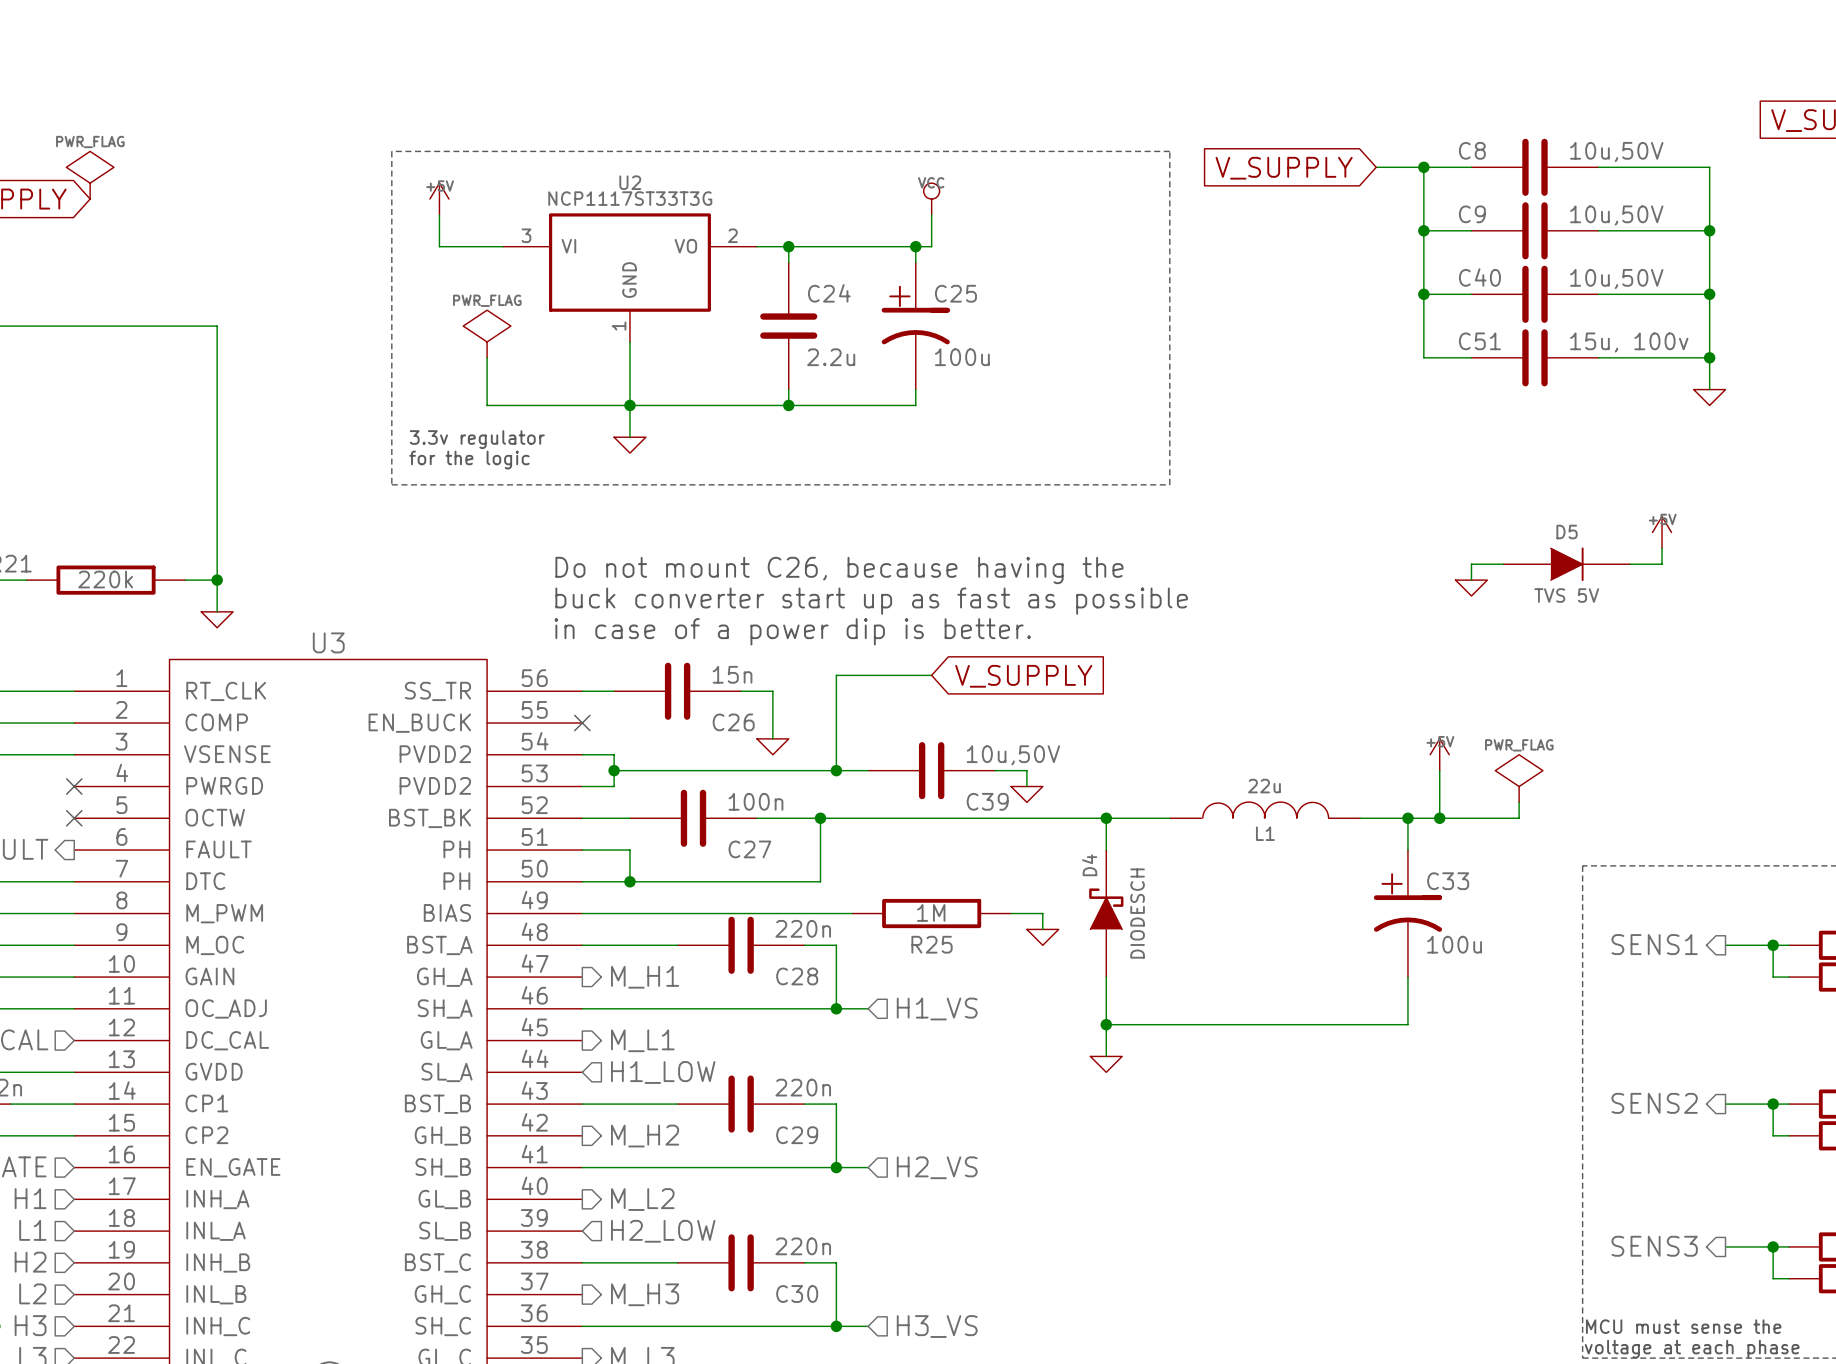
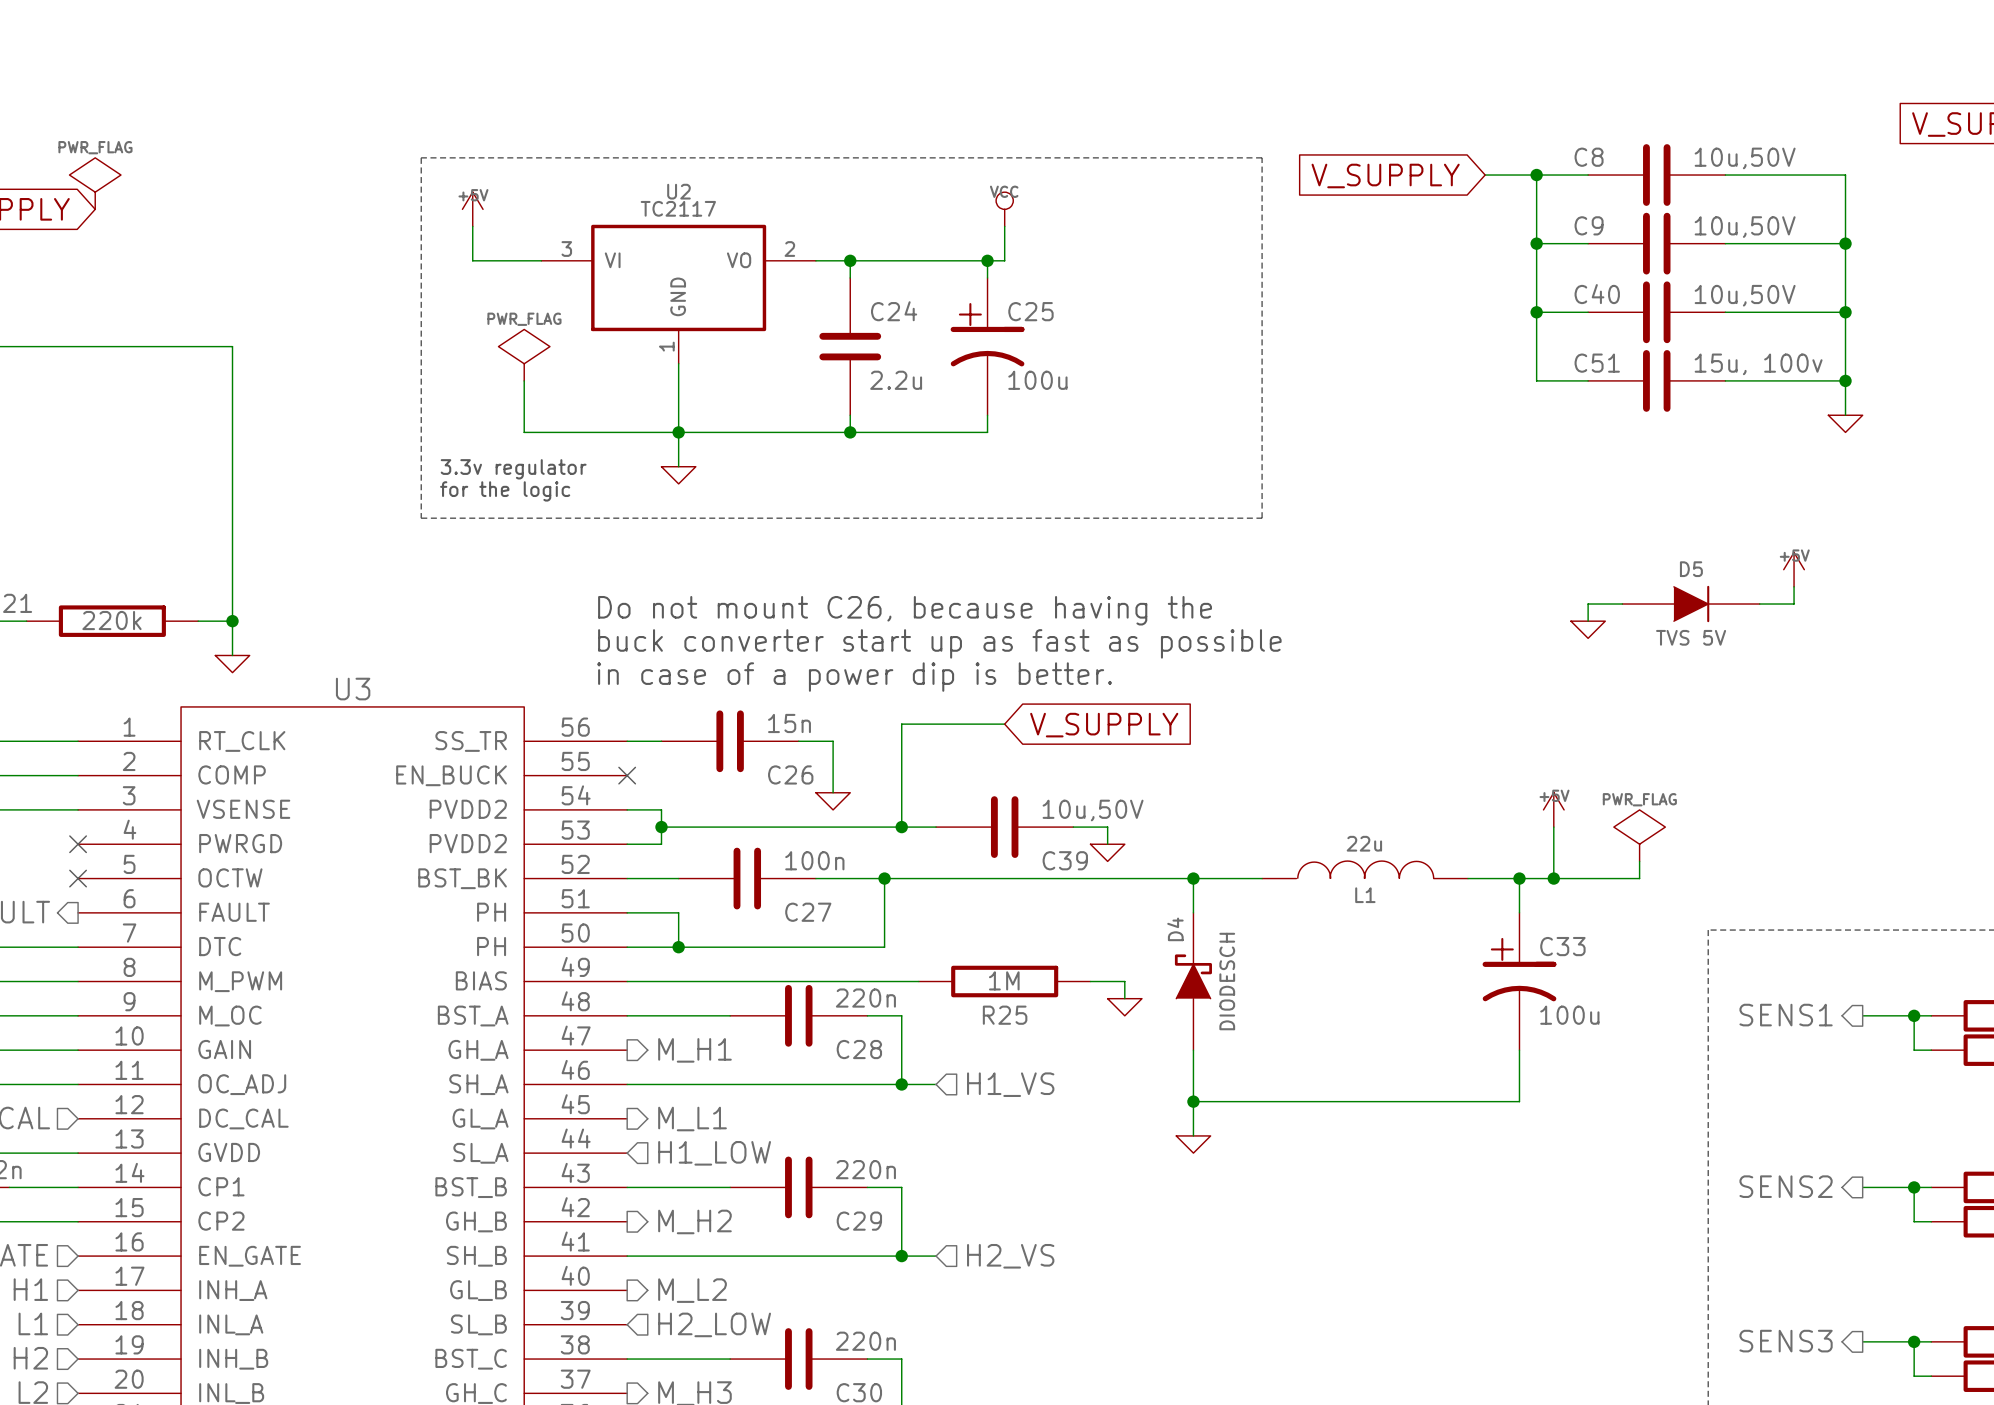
U2 value: NCP1117ST33T3G (630, 198) -> TC2117 (678, 208)

